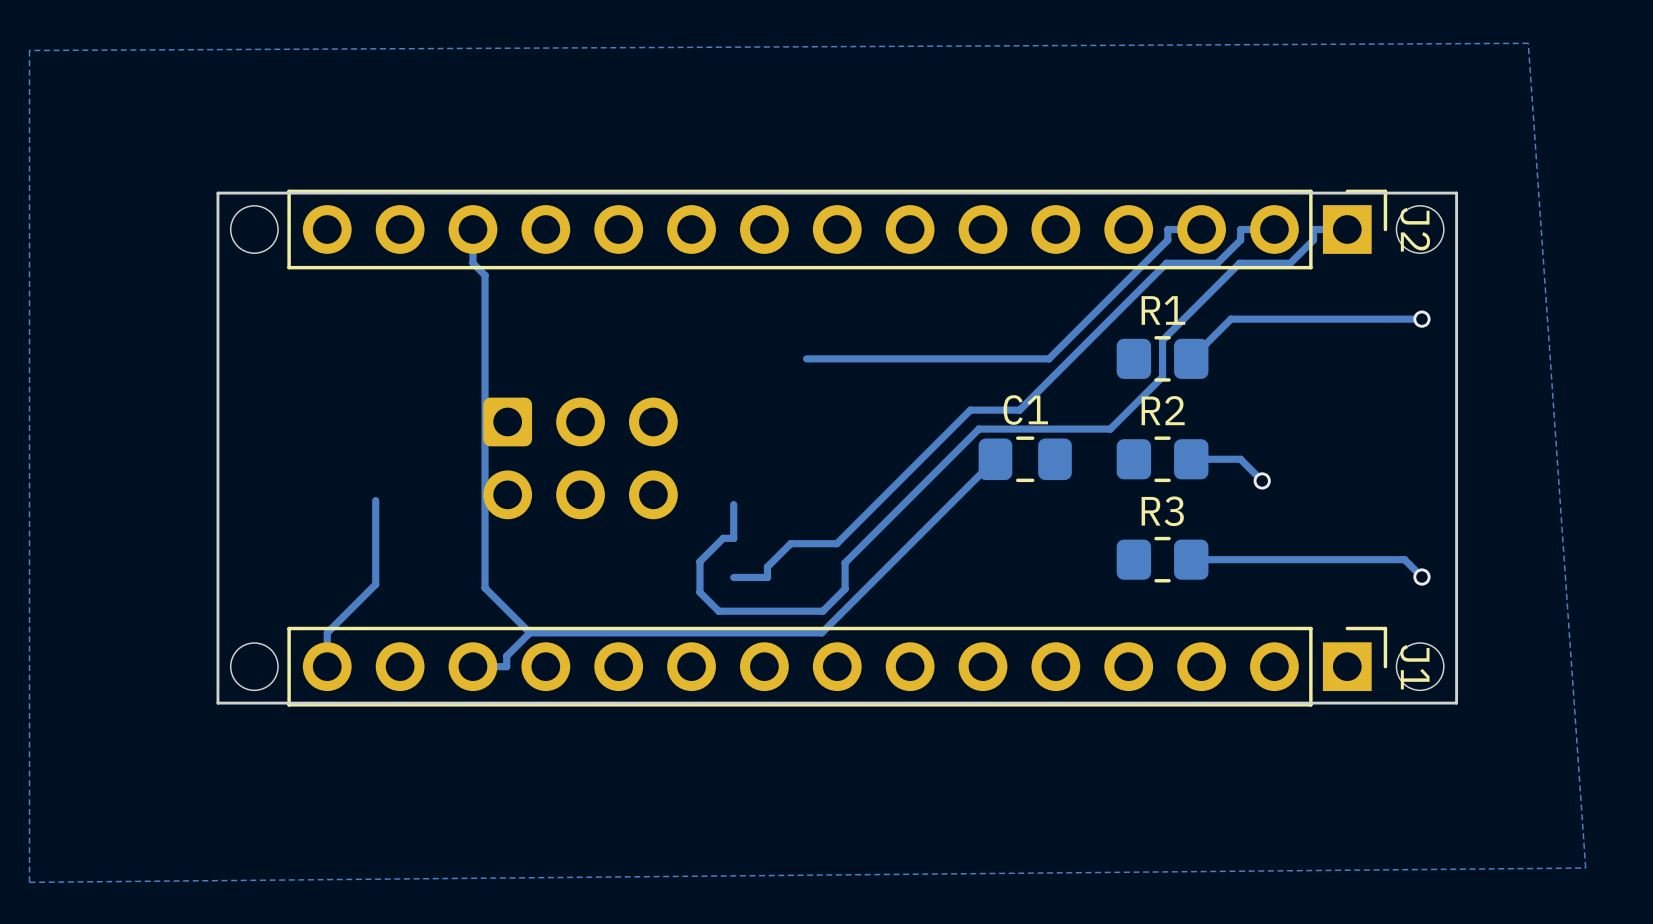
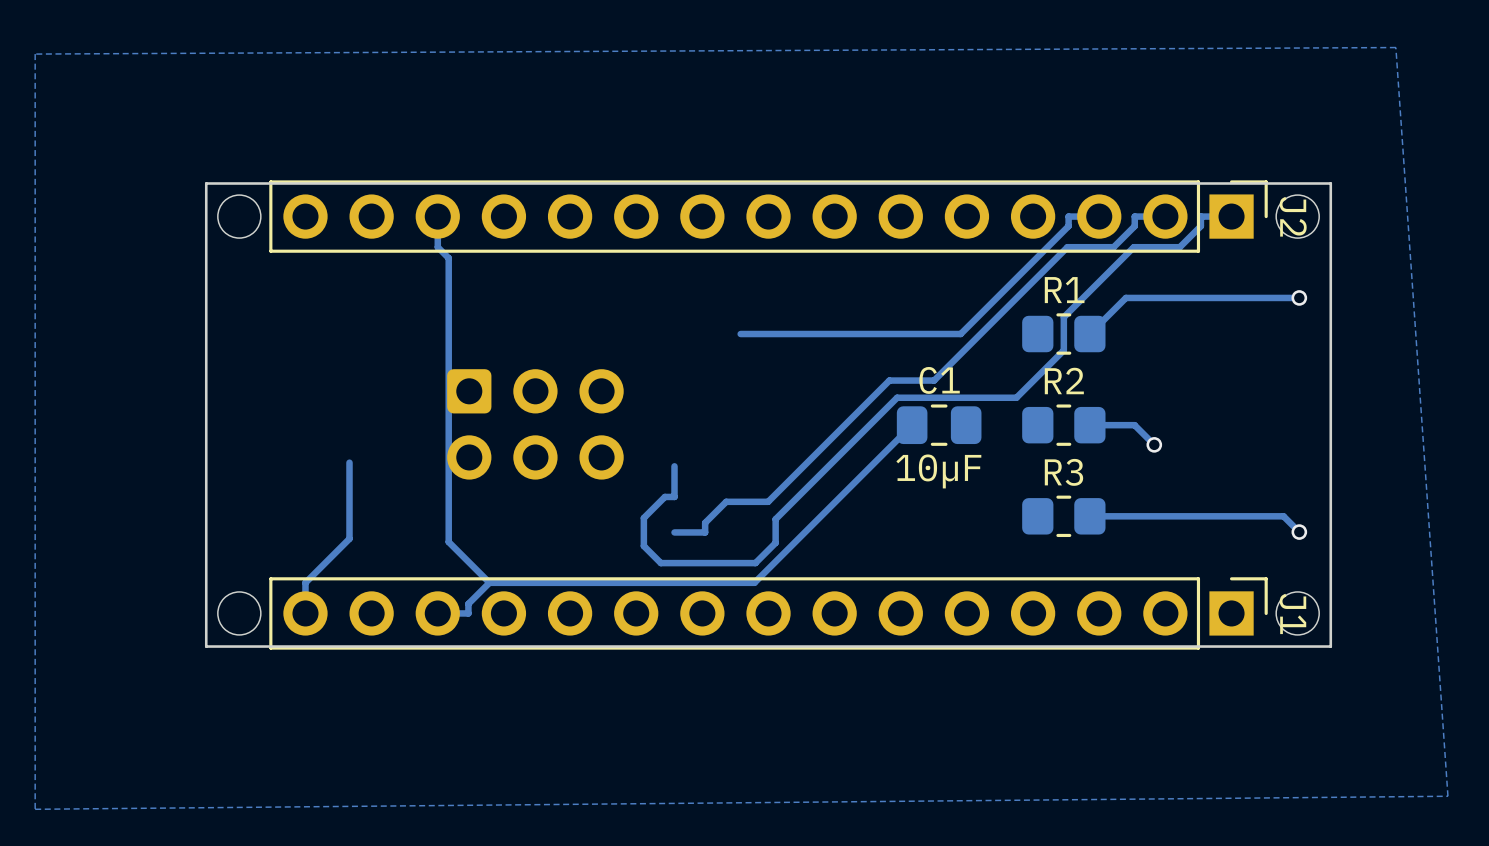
C1 value: none -> 10µF (938, 471)

